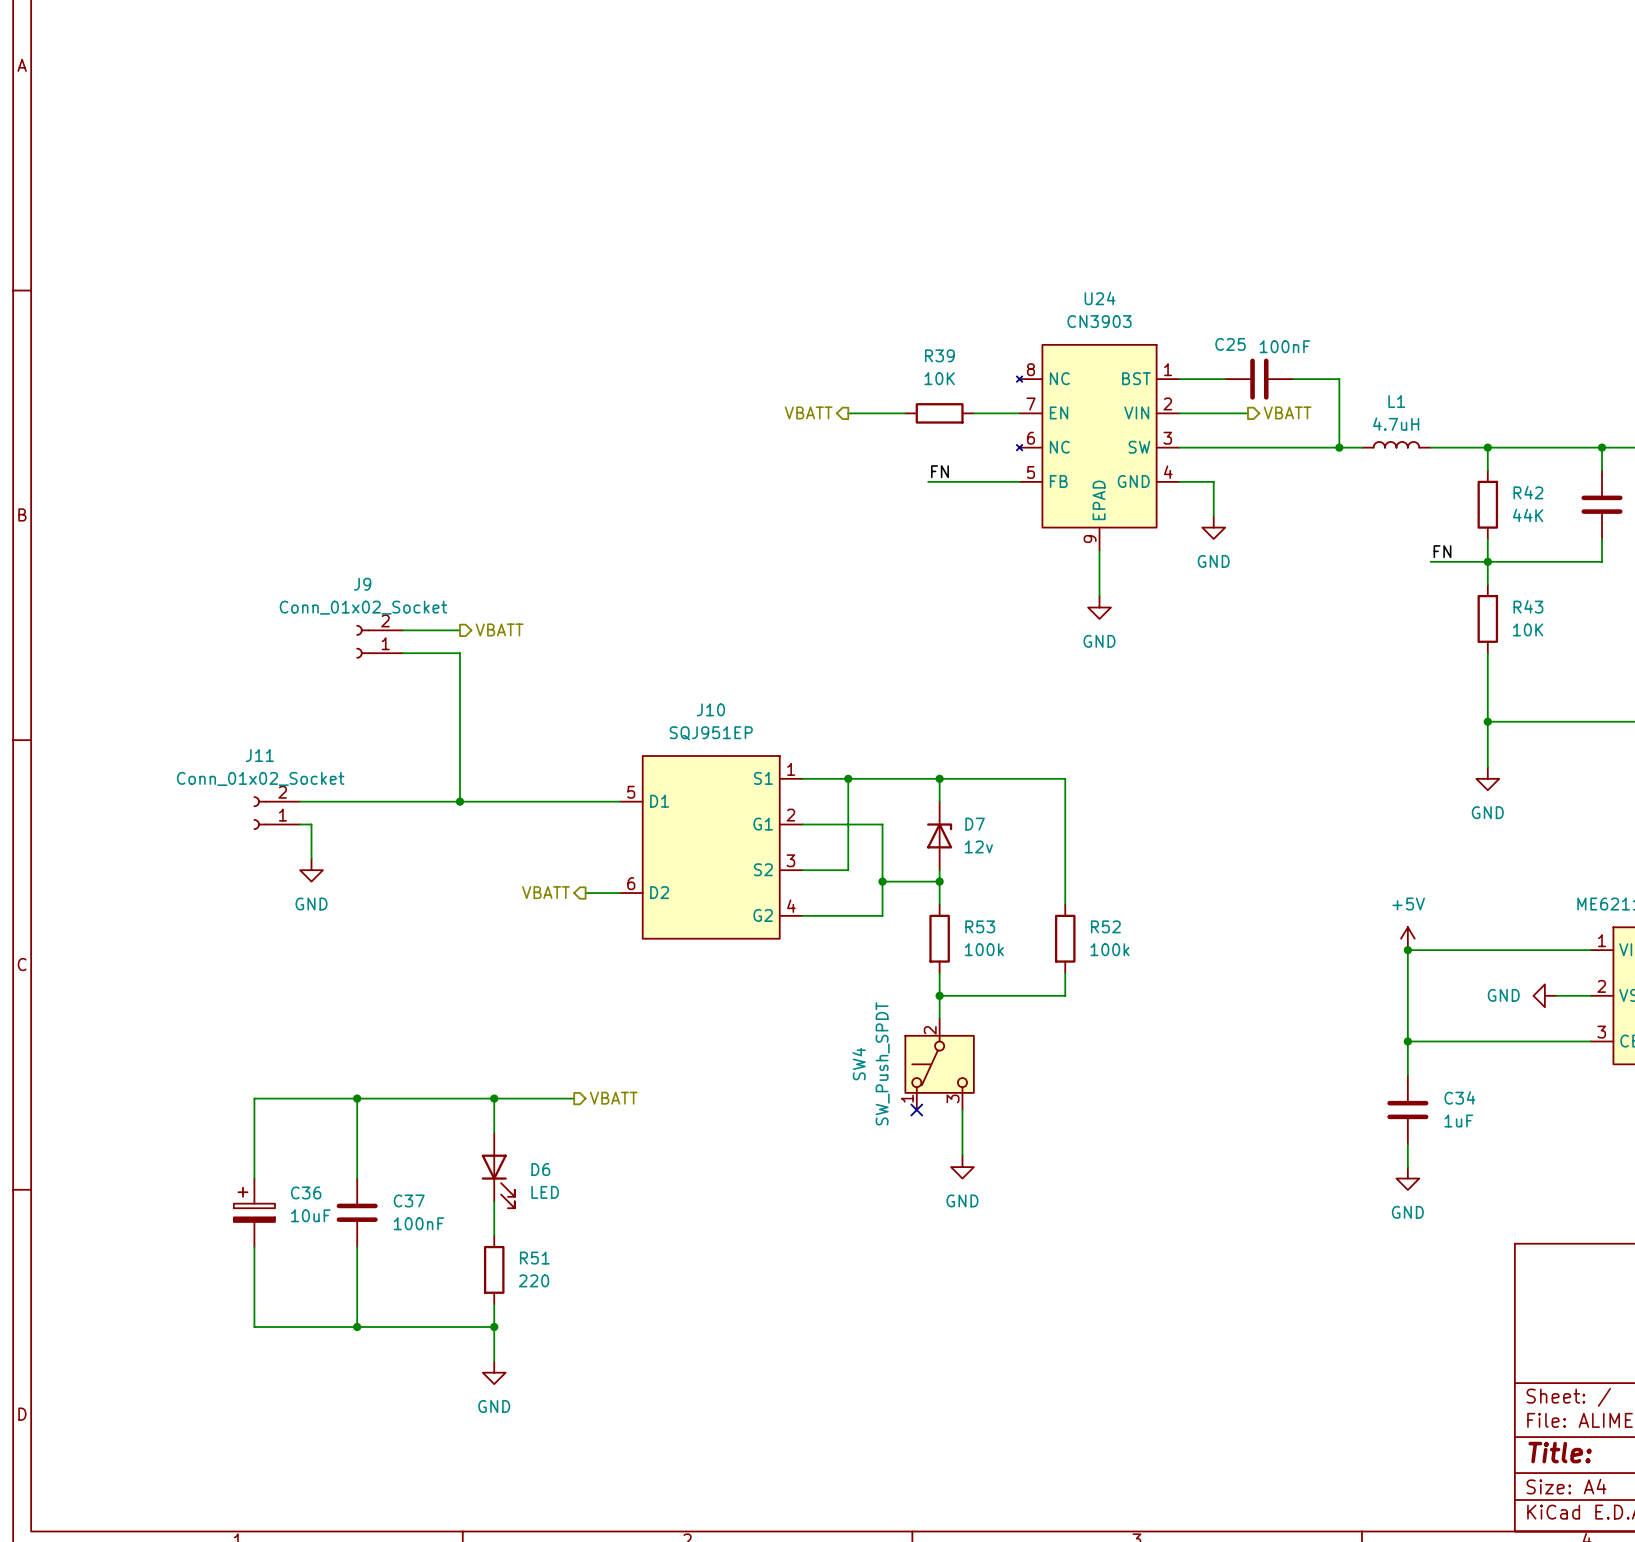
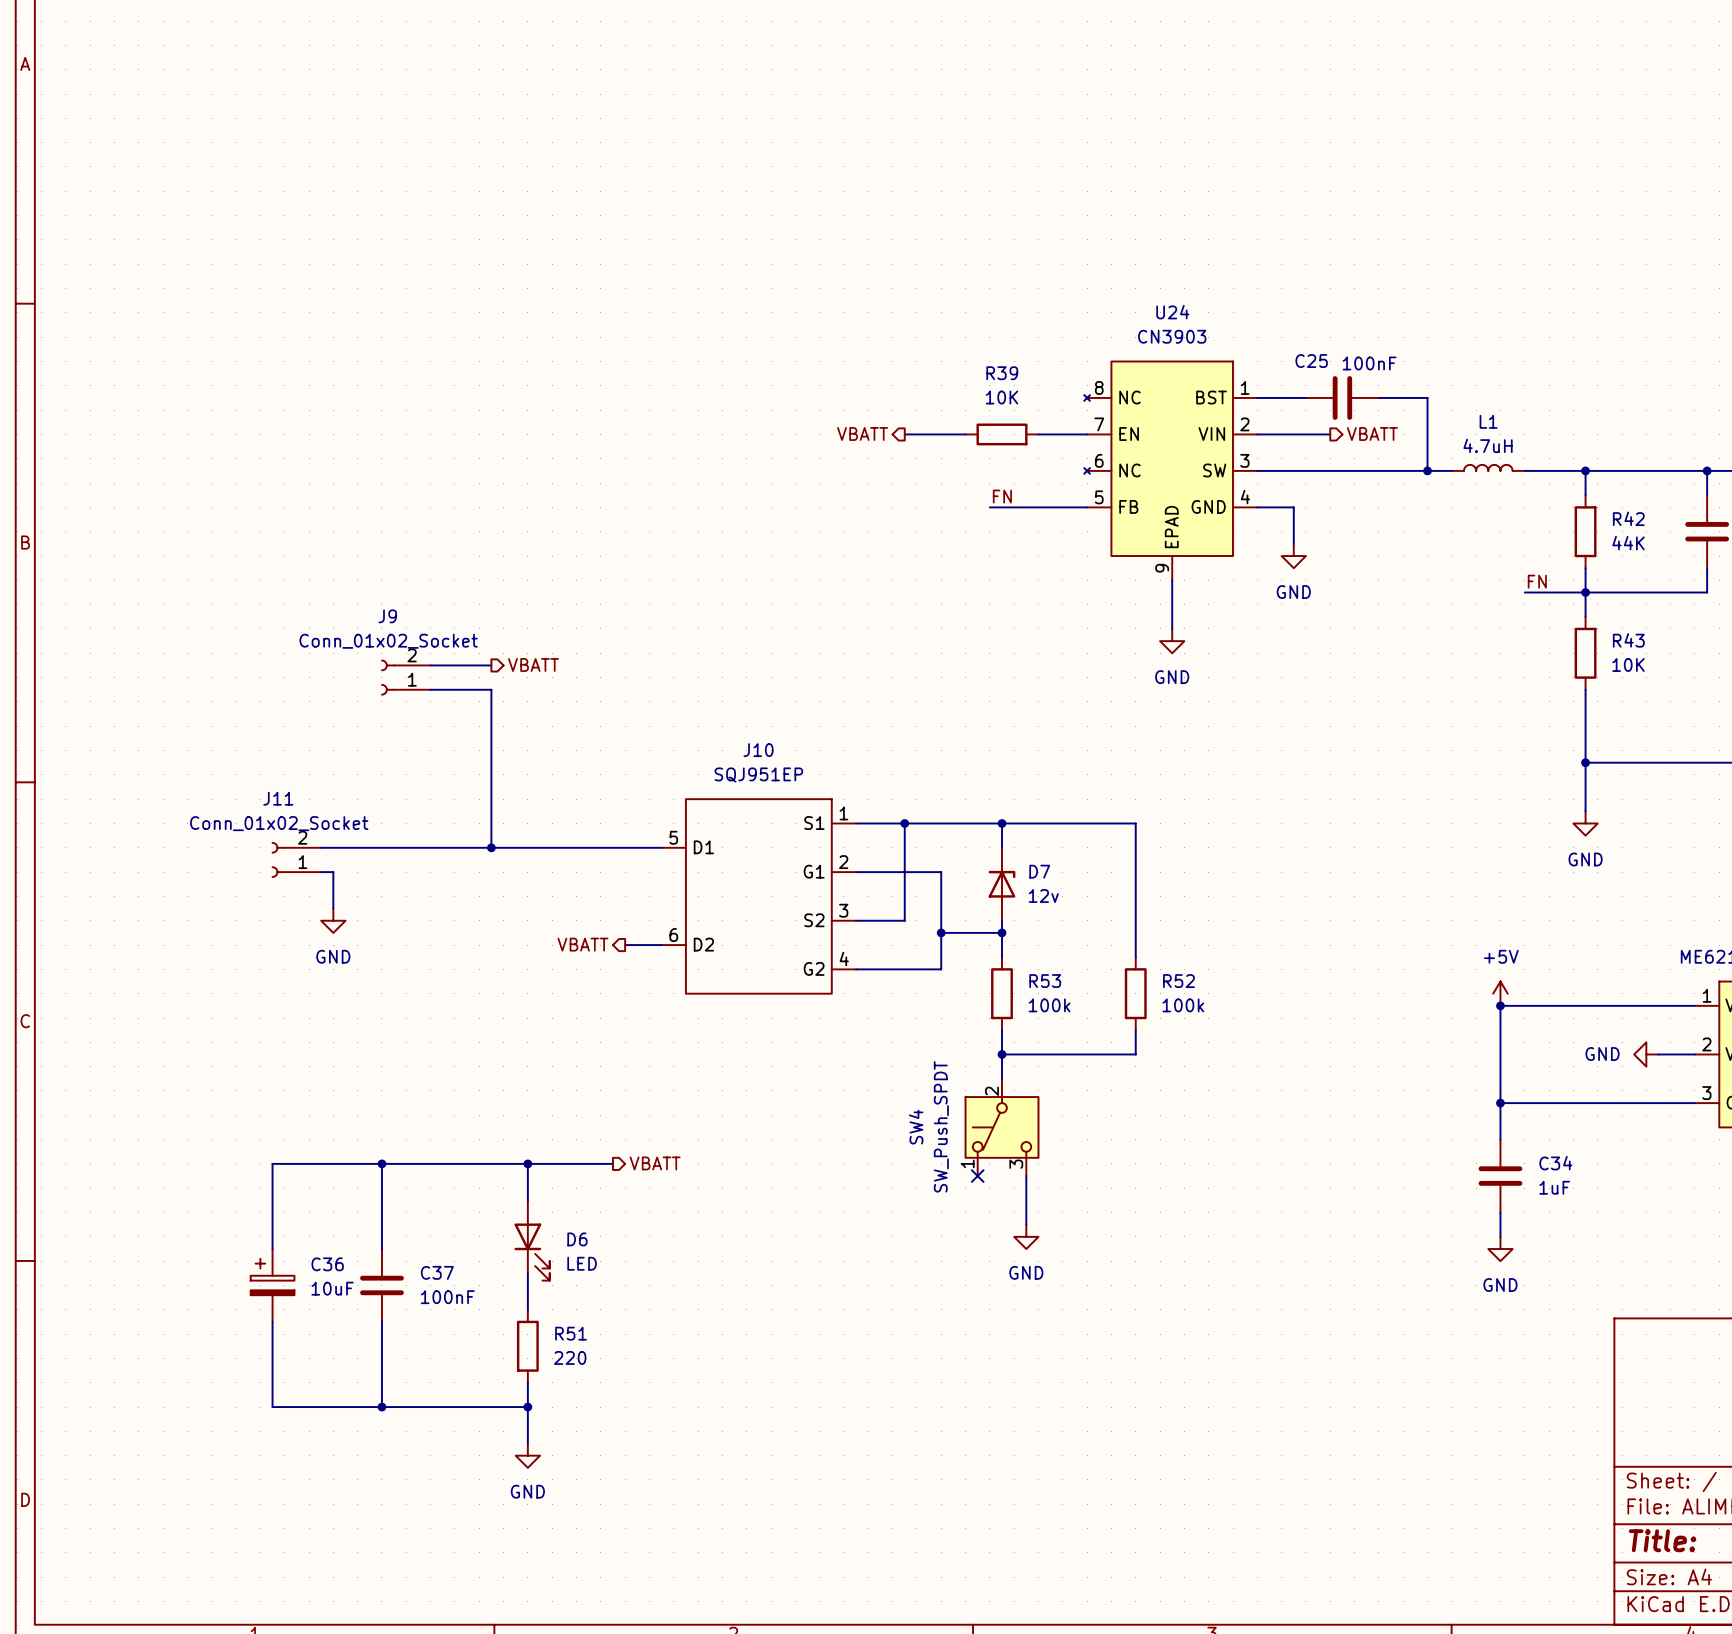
J10 symbol: [619, 755, 803, 939] -> [661, 799, 857, 994]

